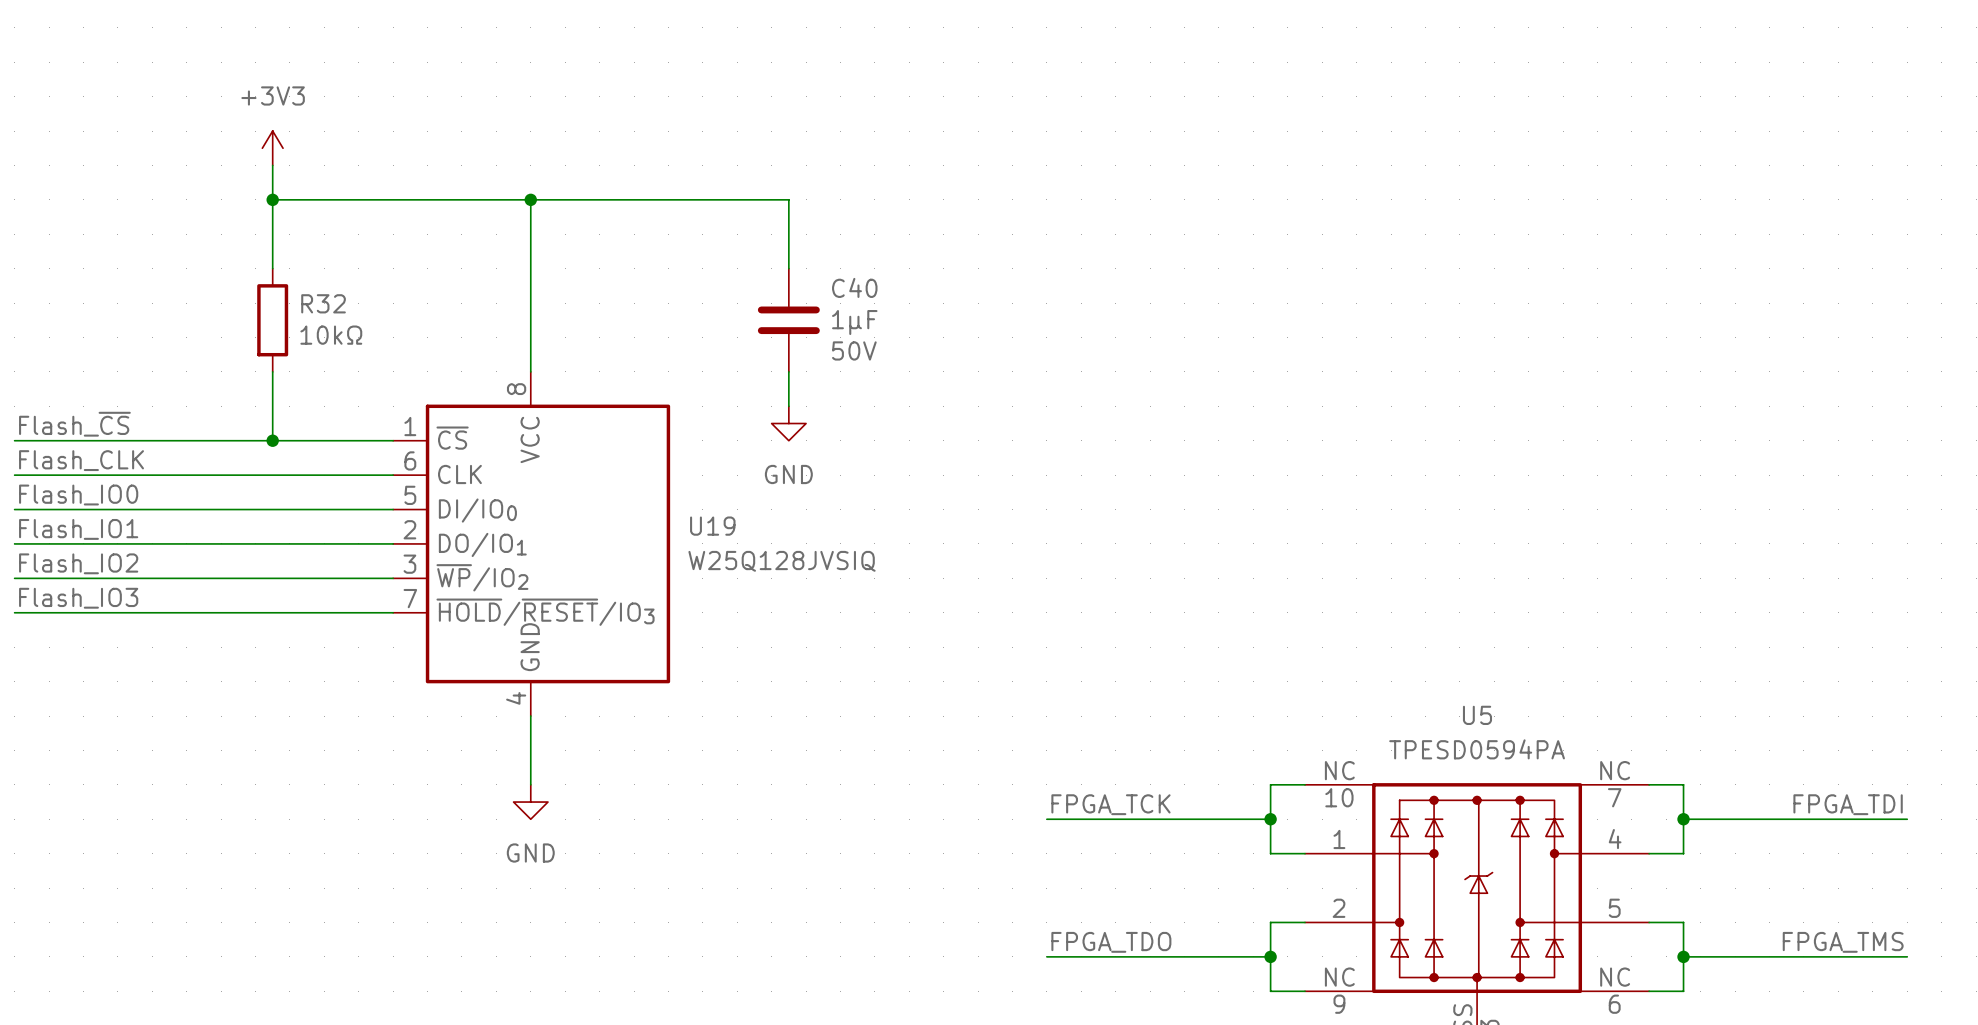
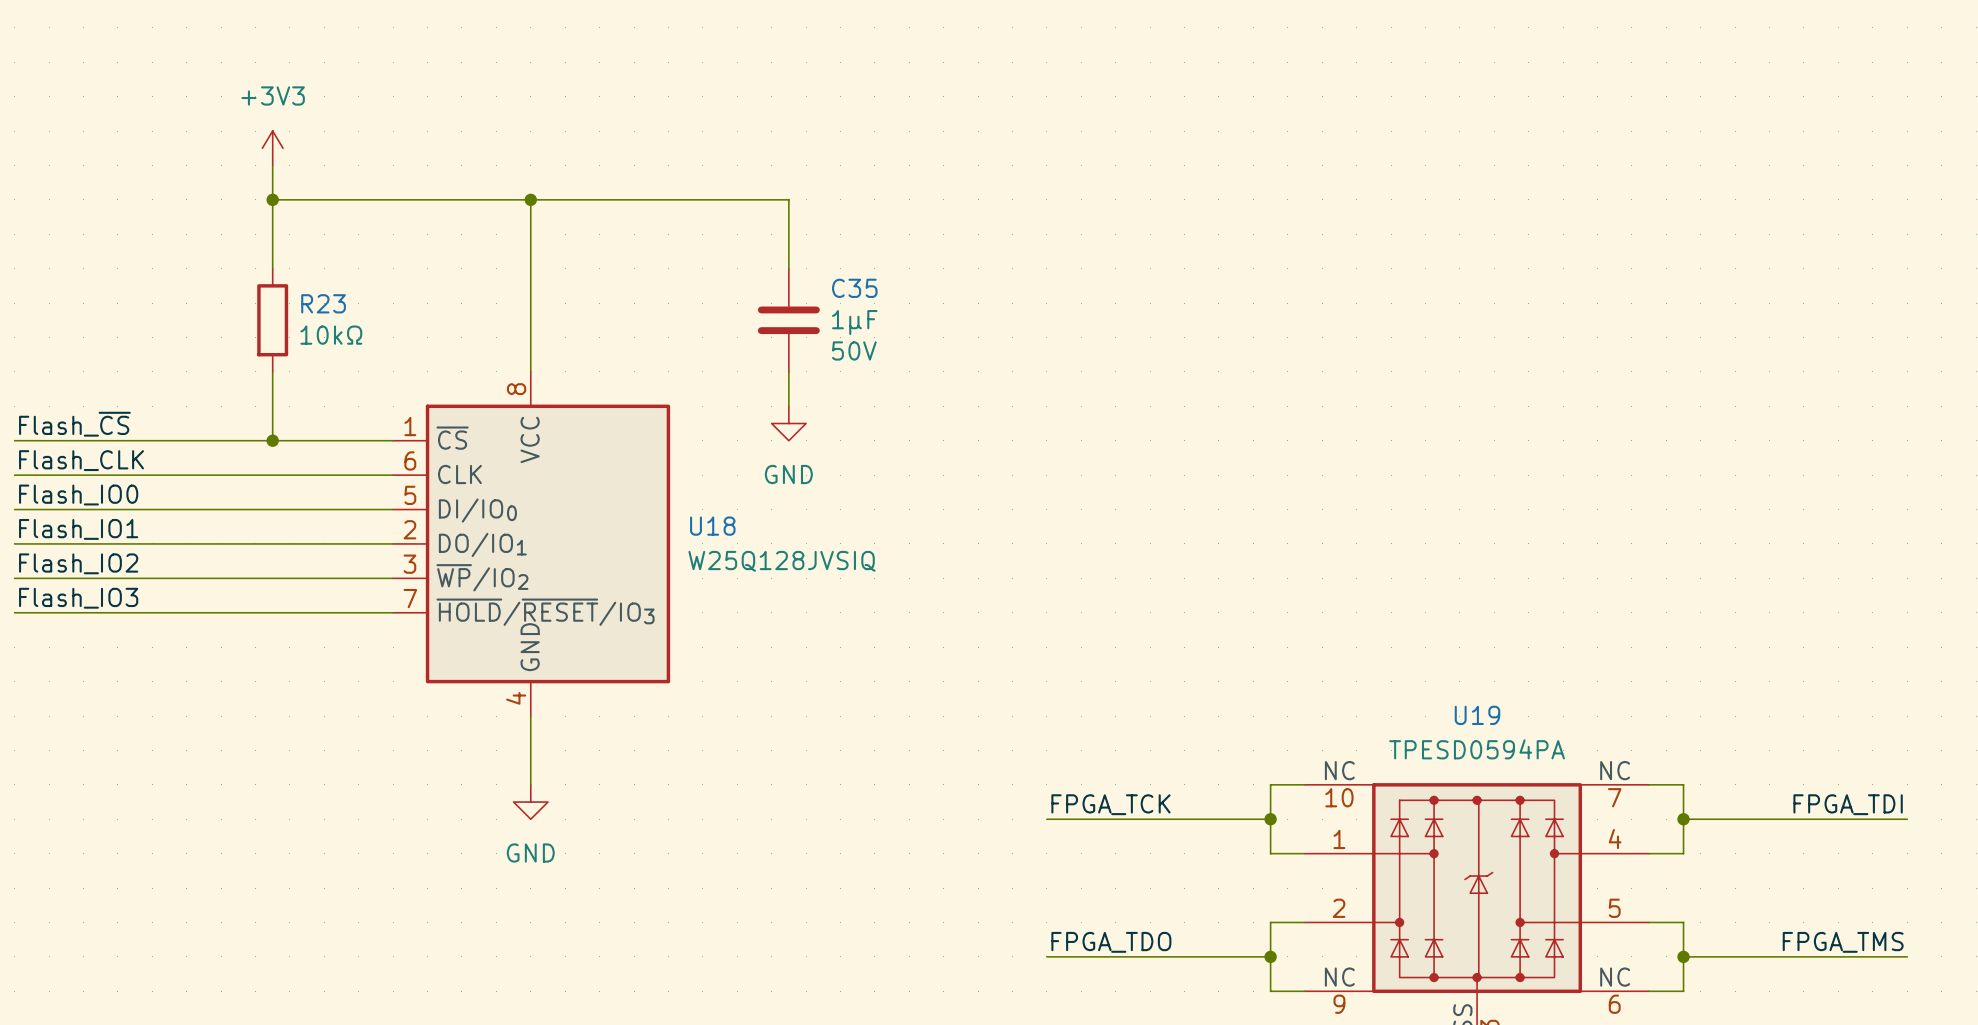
C40 name: C40 (854, 287) -> C35 (854, 288)
R32 name: R32 (323, 303) -> R23 (323, 303)
U19 name: U19 (712, 526) -> U18 (712, 526)
U5 name: U5 (1477, 715) -> U19 (1477, 715)

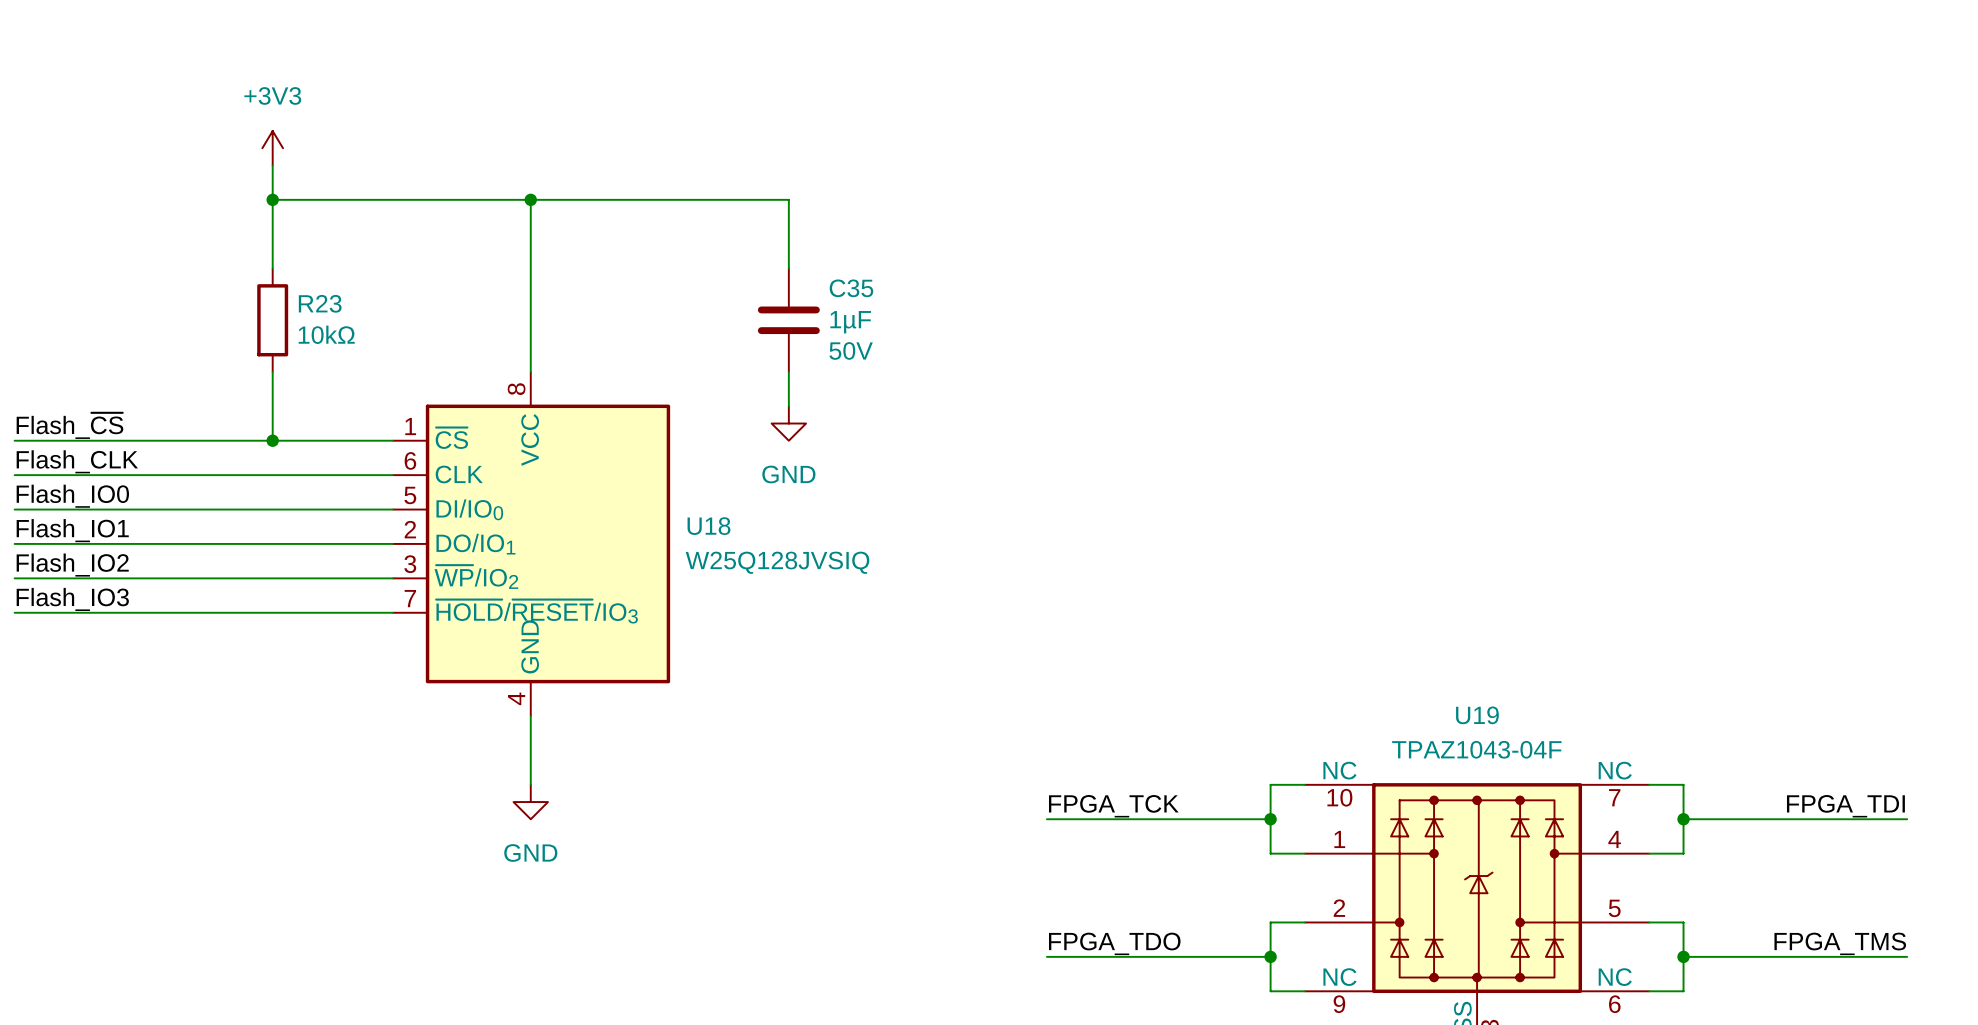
U19 value: TPESD0594PA (1477, 749) -> TPAZ1043-04F (1476, 749)

